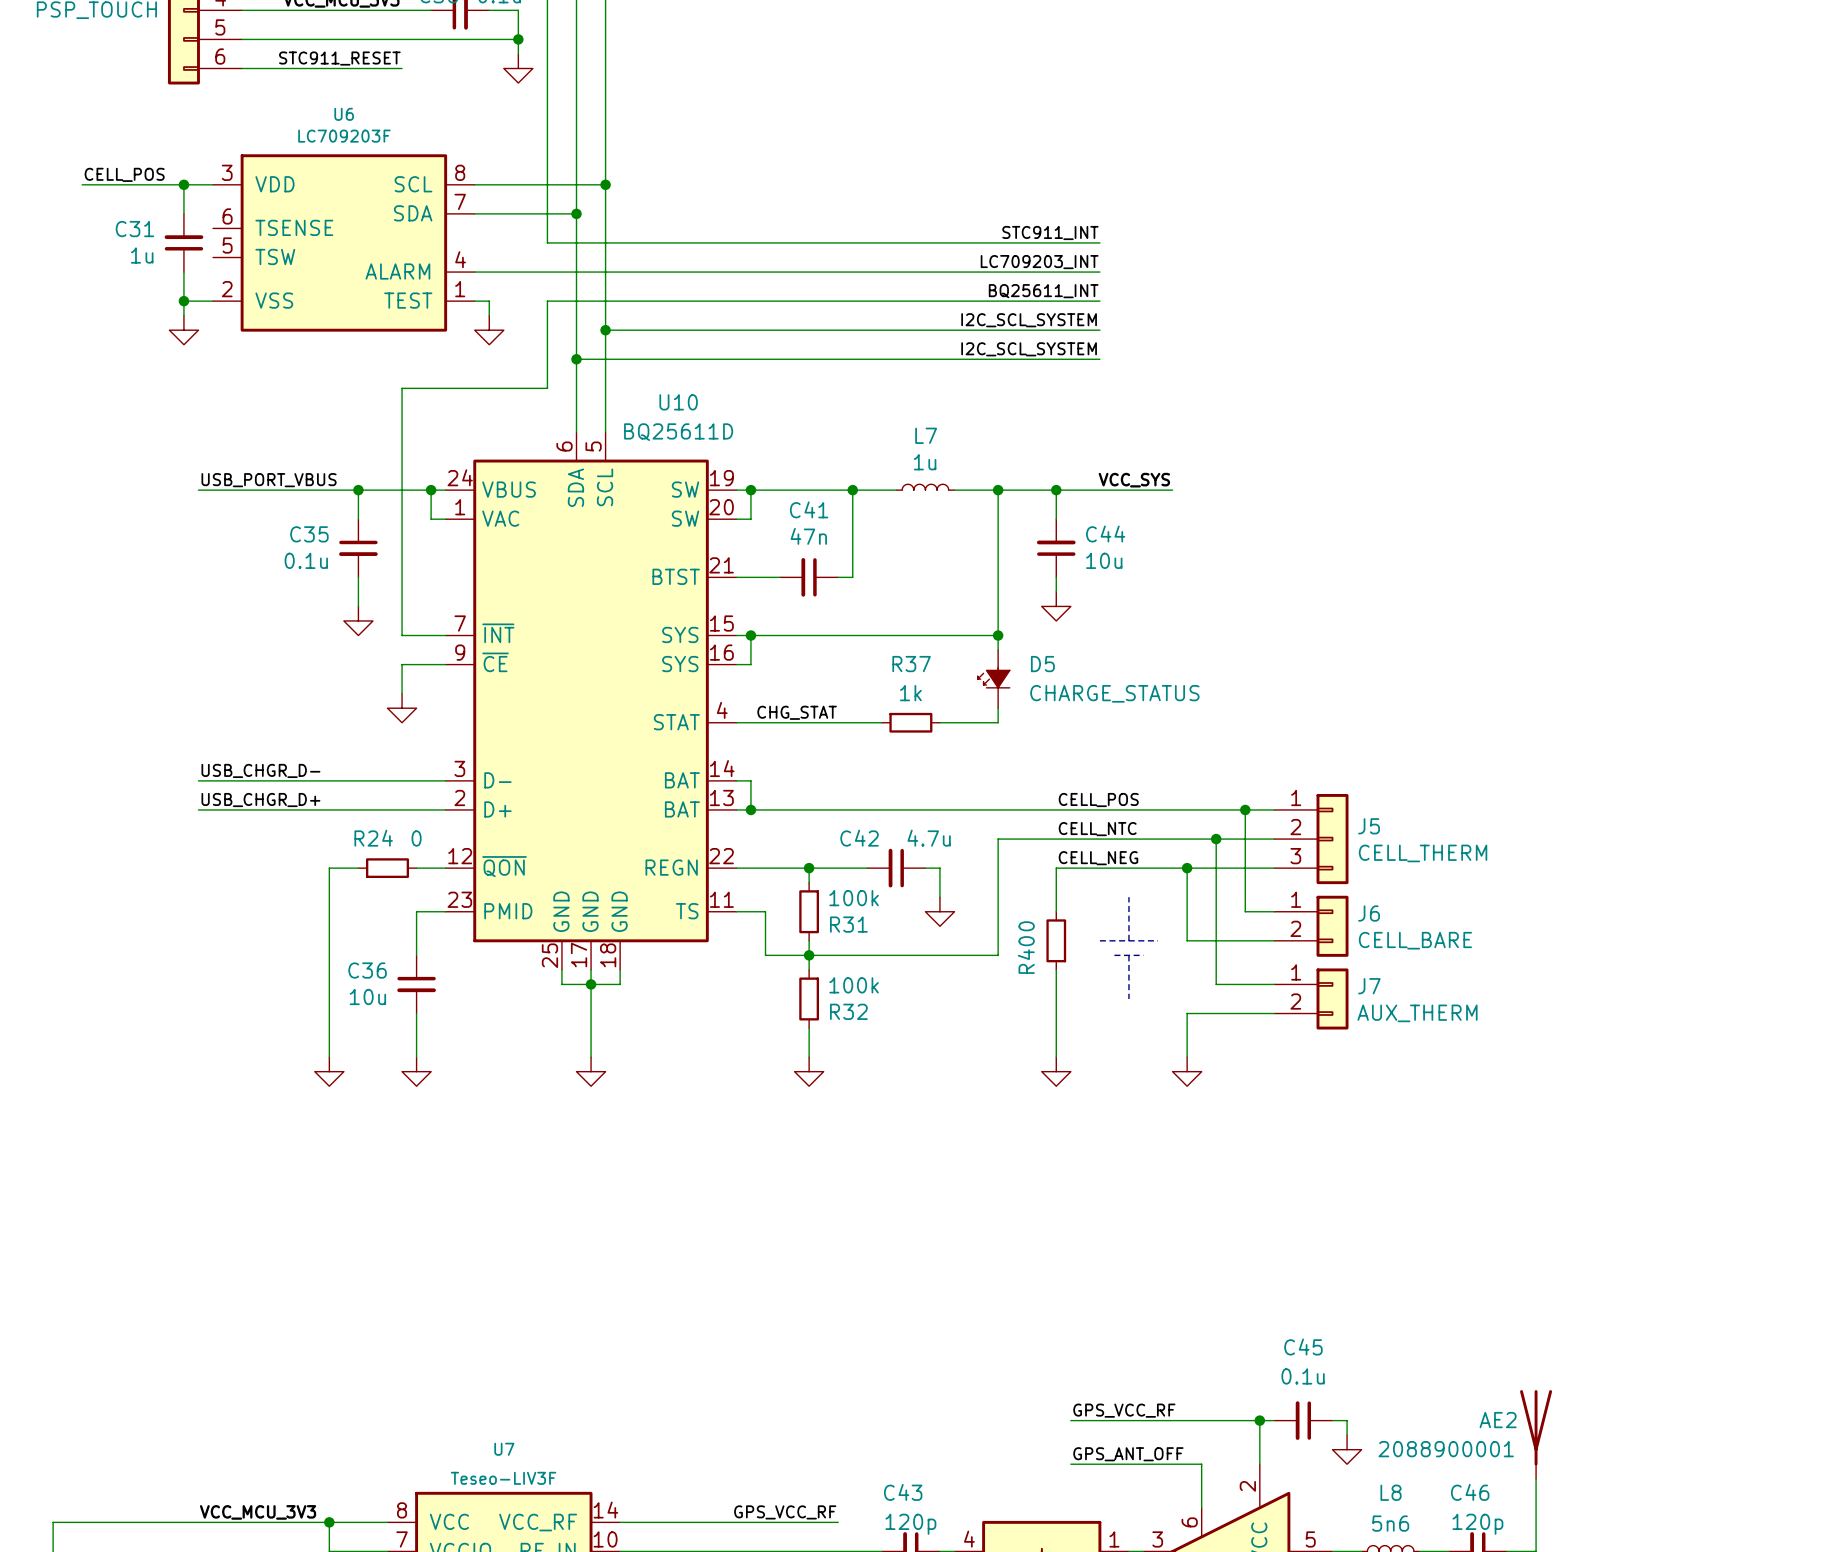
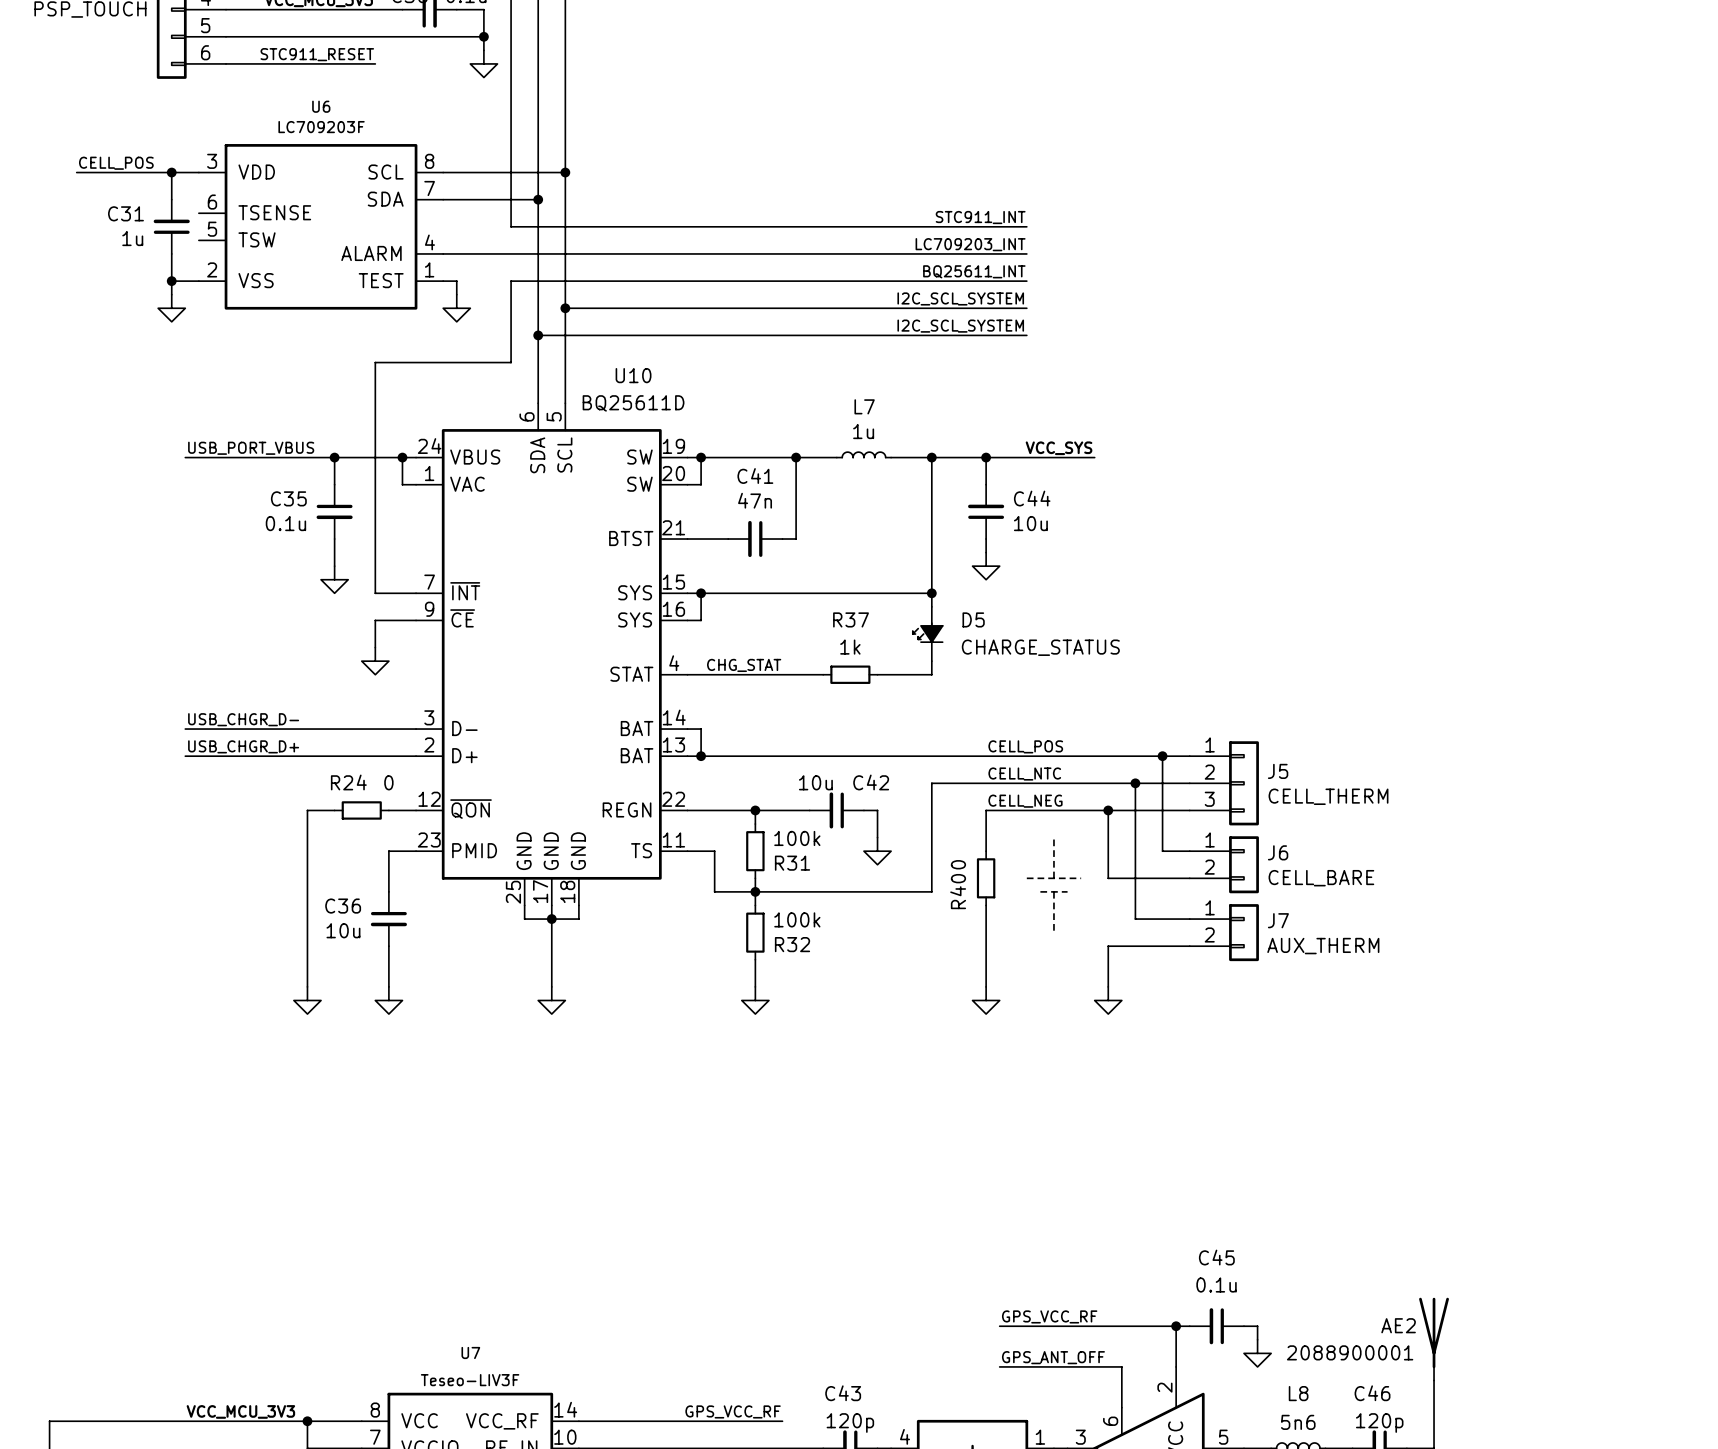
C42 name position: C42 (859, 838) -> C42 (871, 782)
C42 value: 4.7u (929, 838) -> 10u (815, 782)

